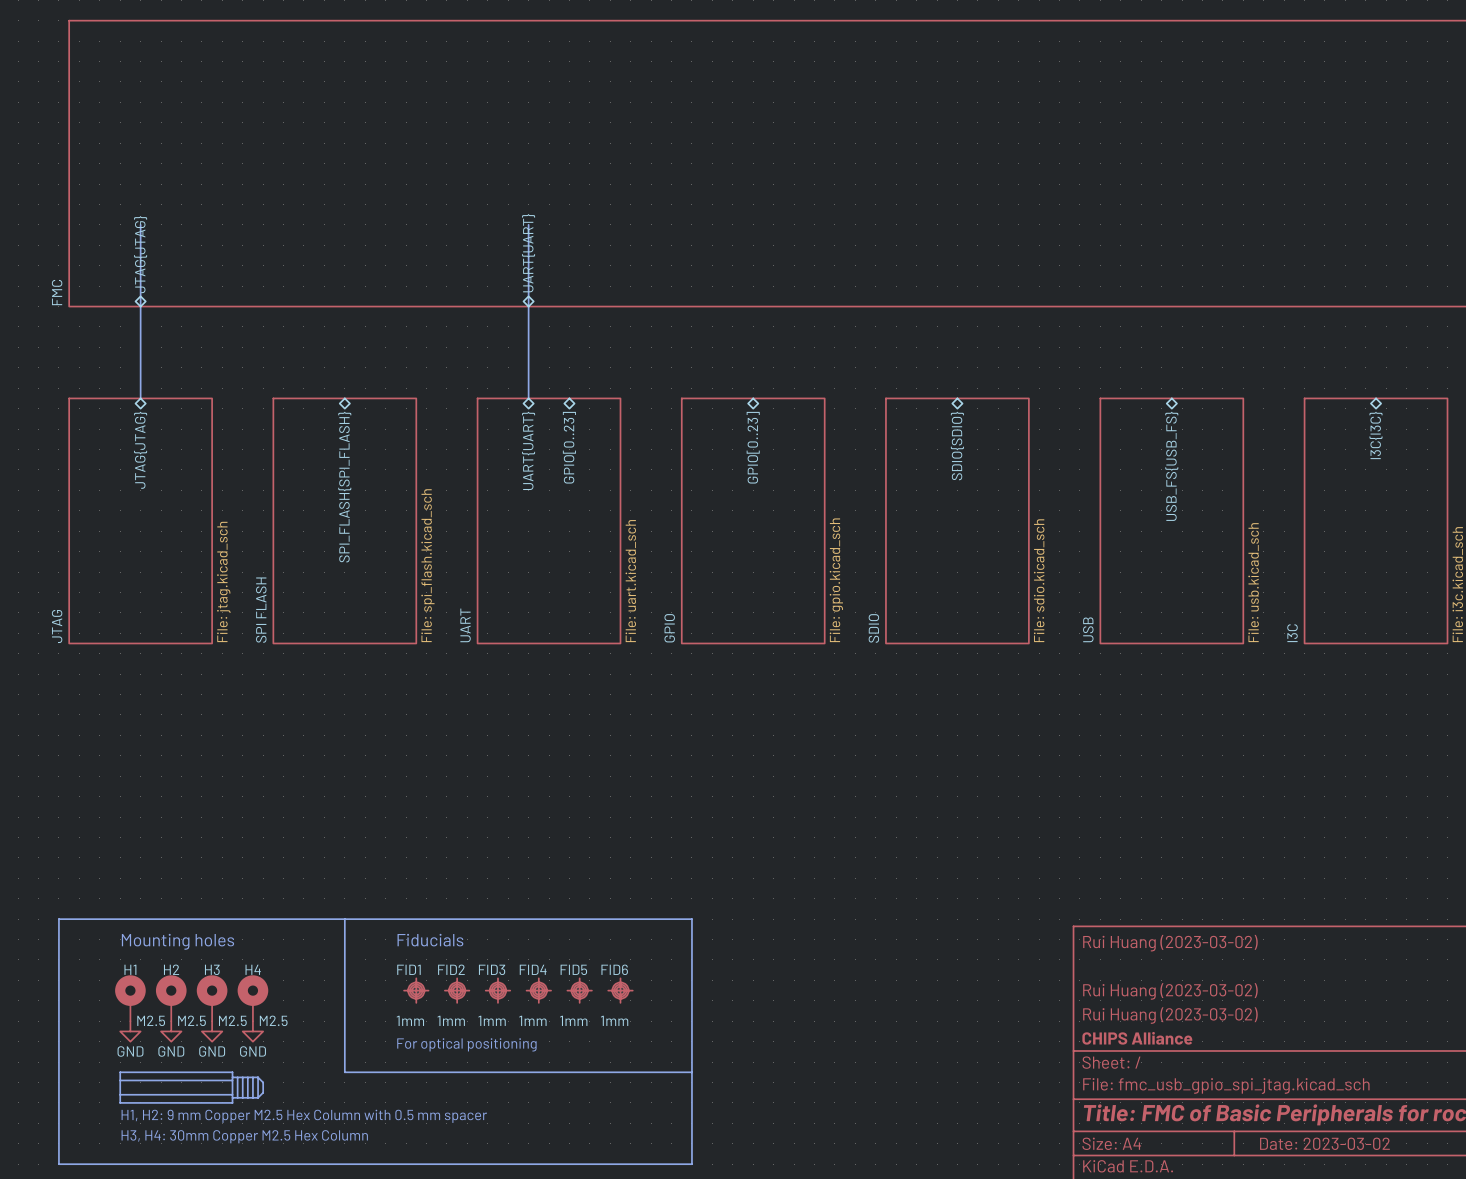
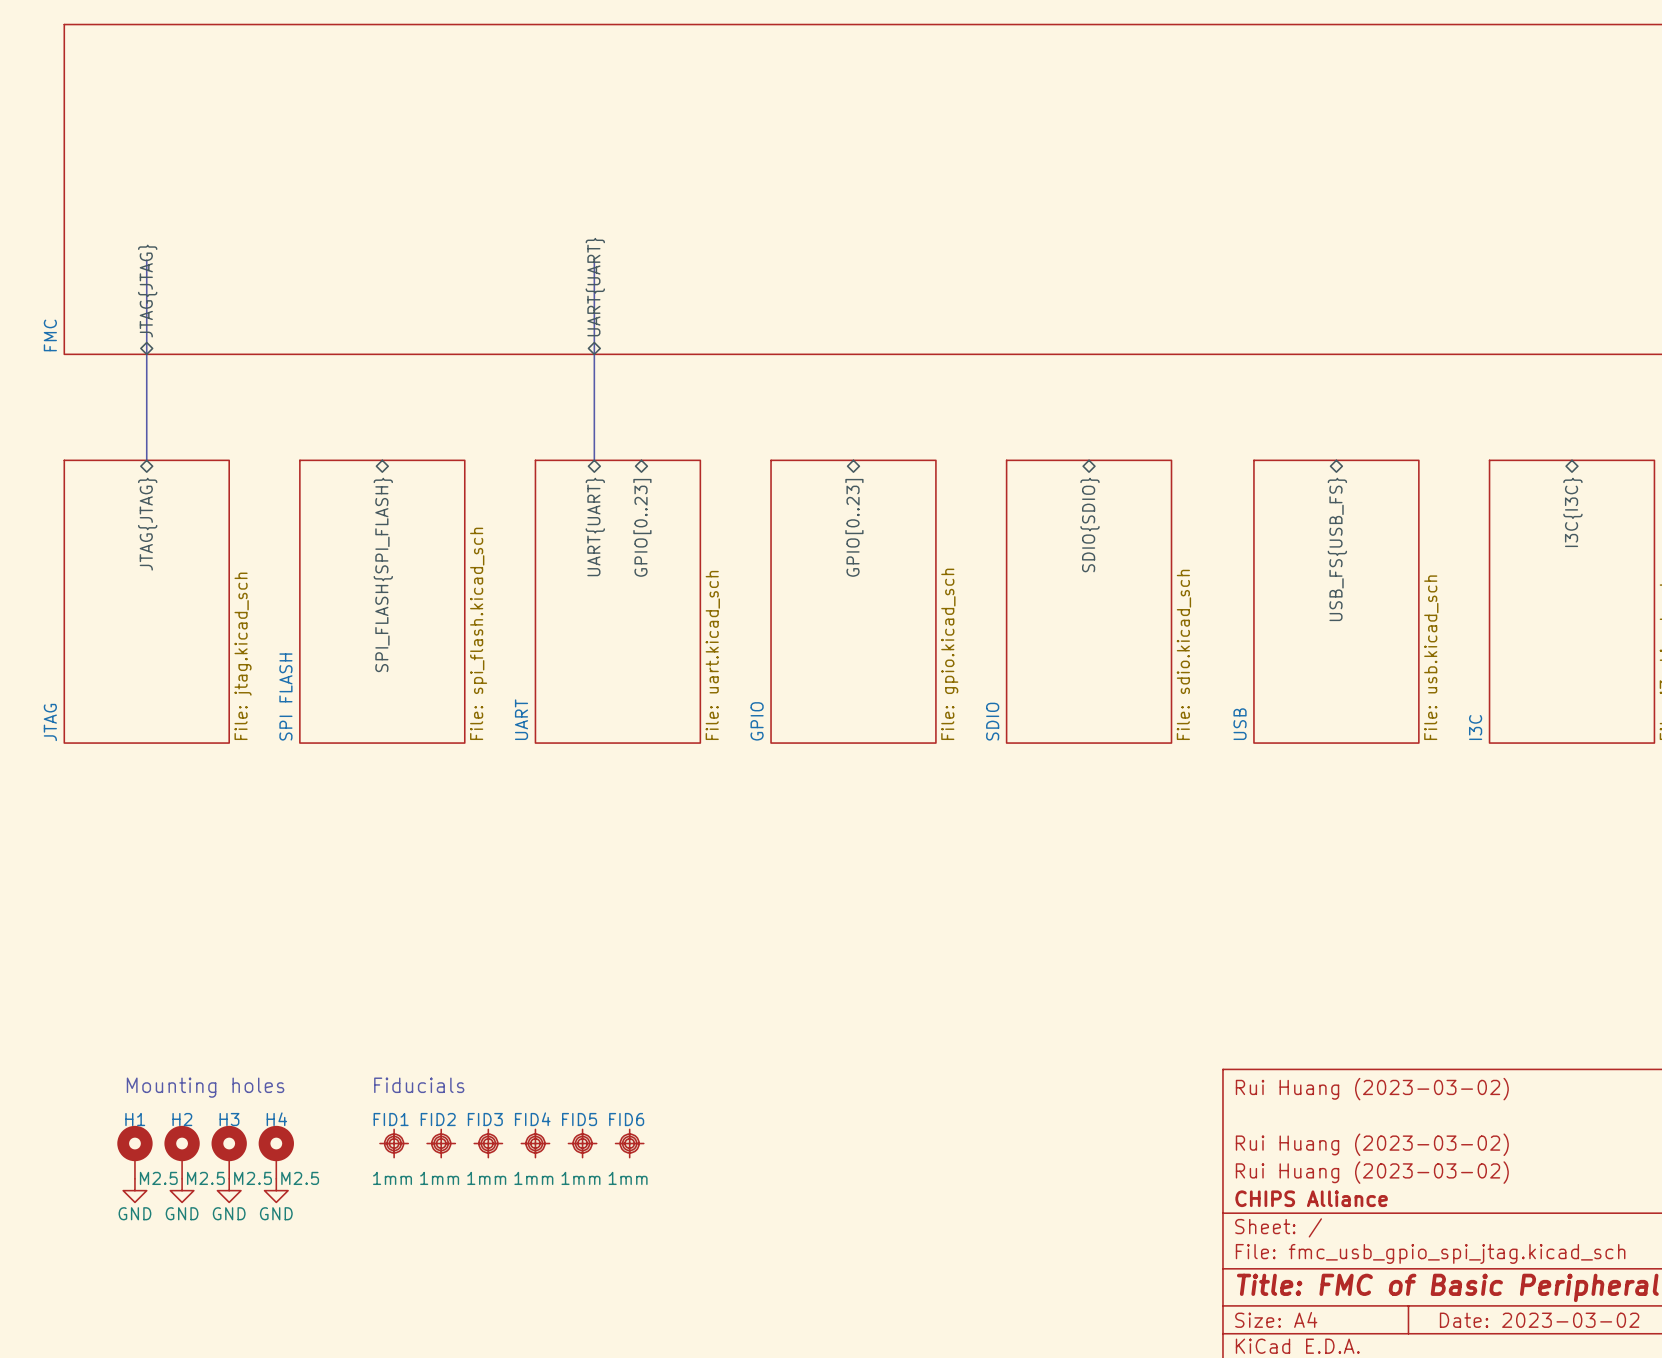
line: (58, 919) (691, 919) (691, 1164) (58, 1164) (58, 919) -> none
line: (344, 919) (344, 1072) (691, 1072) -> none
text position: Fiducials (430, 940) -> Fiducials (419, 1085)
FID1 position: (416, 990) -> (394, 1143)
FID2 position: (457, 990) -> (441, 1143)
FID3 position: (497, 990) -> (488, 1143)
FID4 position: (538, 990) -> (535, 1143)
FID5 position: (579, 990) -> (582, 1143)
FID6 position: (620, 990) -> (629, 1143)
text: For optical positioning (466, 1044) -> none
line: (120, 1072) (232, 1072) (232, 1102) (120, 1102) (120, 1072) -> none
line: (232, 1077) (258, 1077) -> none
line: (237, 1077) (237, 1097) -> none
line: (242, 1077) (242, 1097) -> none
line: (247, 1077) (247, 1097) -> none
line: (252, 1077) (252, 1097) -> none
line: (258, 1077) (258, 1097) -> none
line: (258, 1077) (263, 1082) (263, 1092) (258, 1097) -> none
line: (120, 1080) (232, 1080) -> none
line: (120, 1094) (232, 1094) -> none
line: (232, 1097) (258, 1097) -> none
text: H1, H2: 9 mm Copper M2.5 Hex Column with 0.5 mm spacer (304, 1116) -> none
text: H3, H4: 30mm Copper M2.5 Hex Column (244, 1136) -> none

